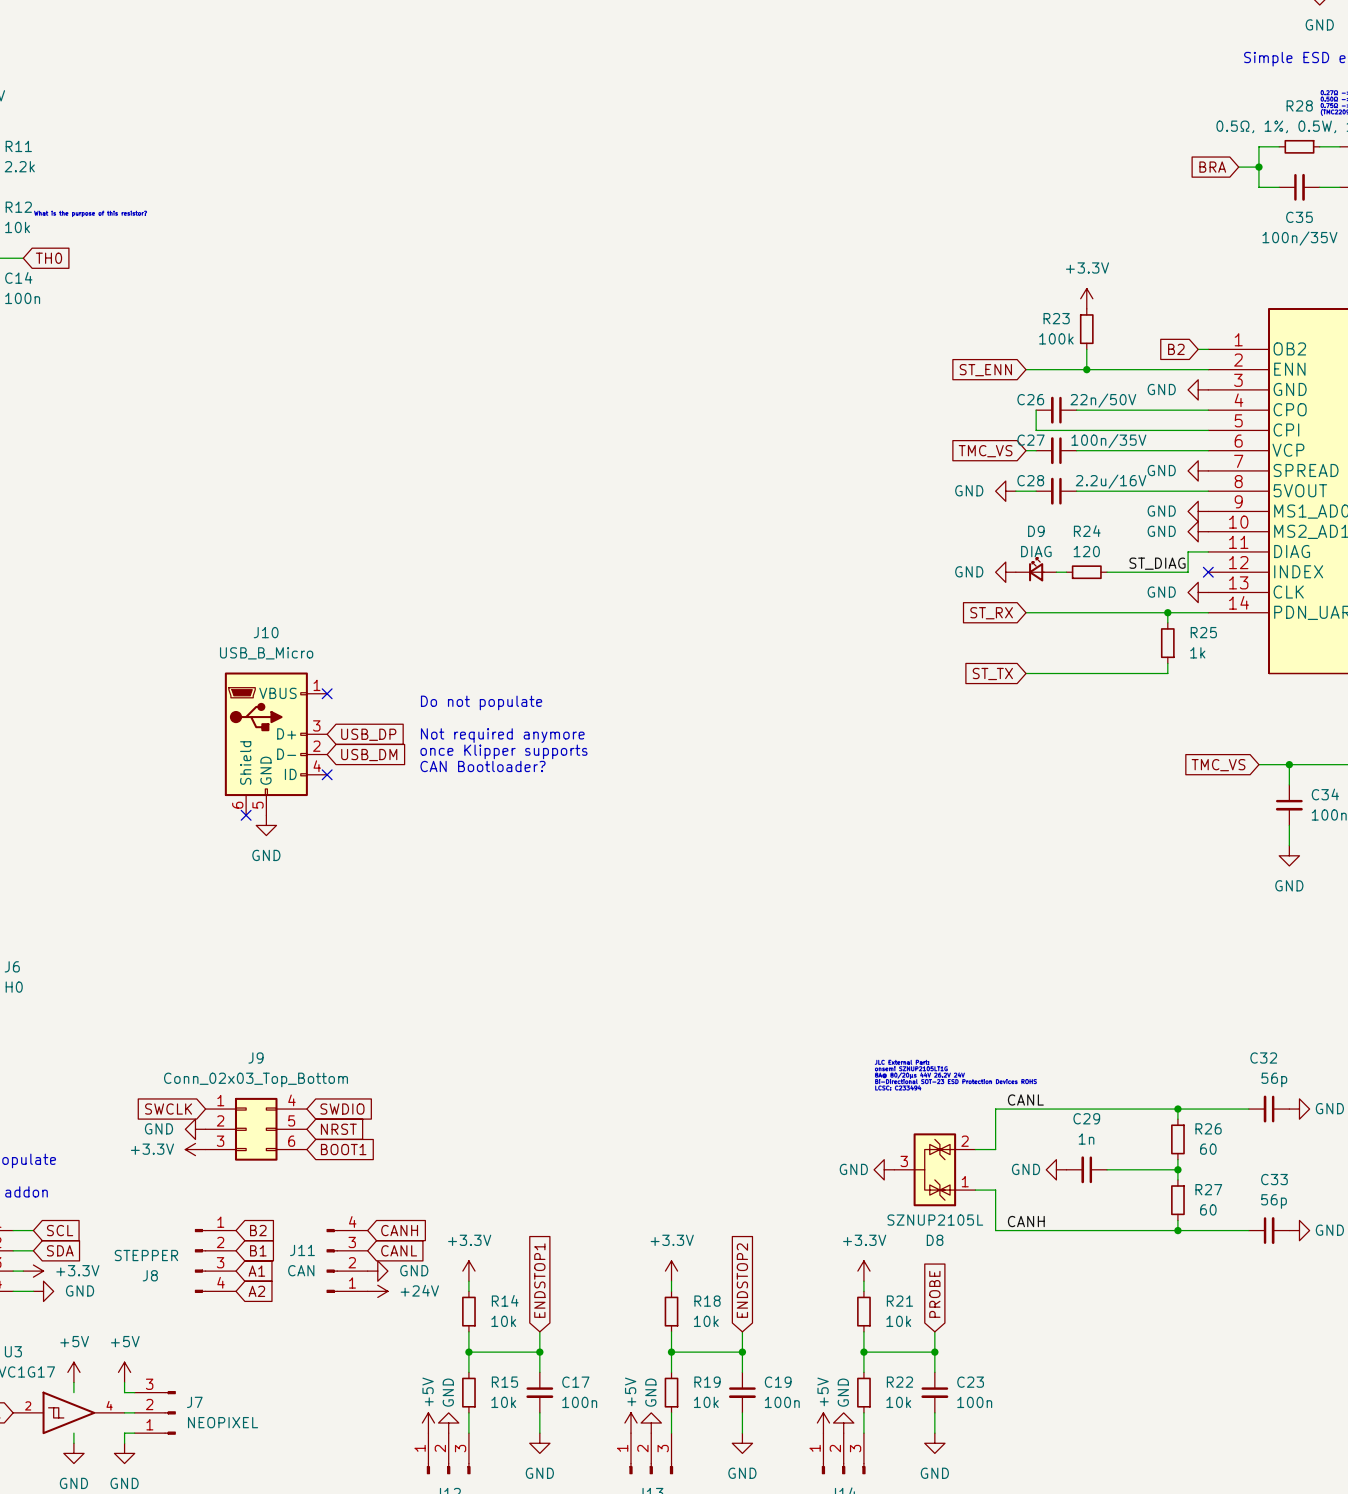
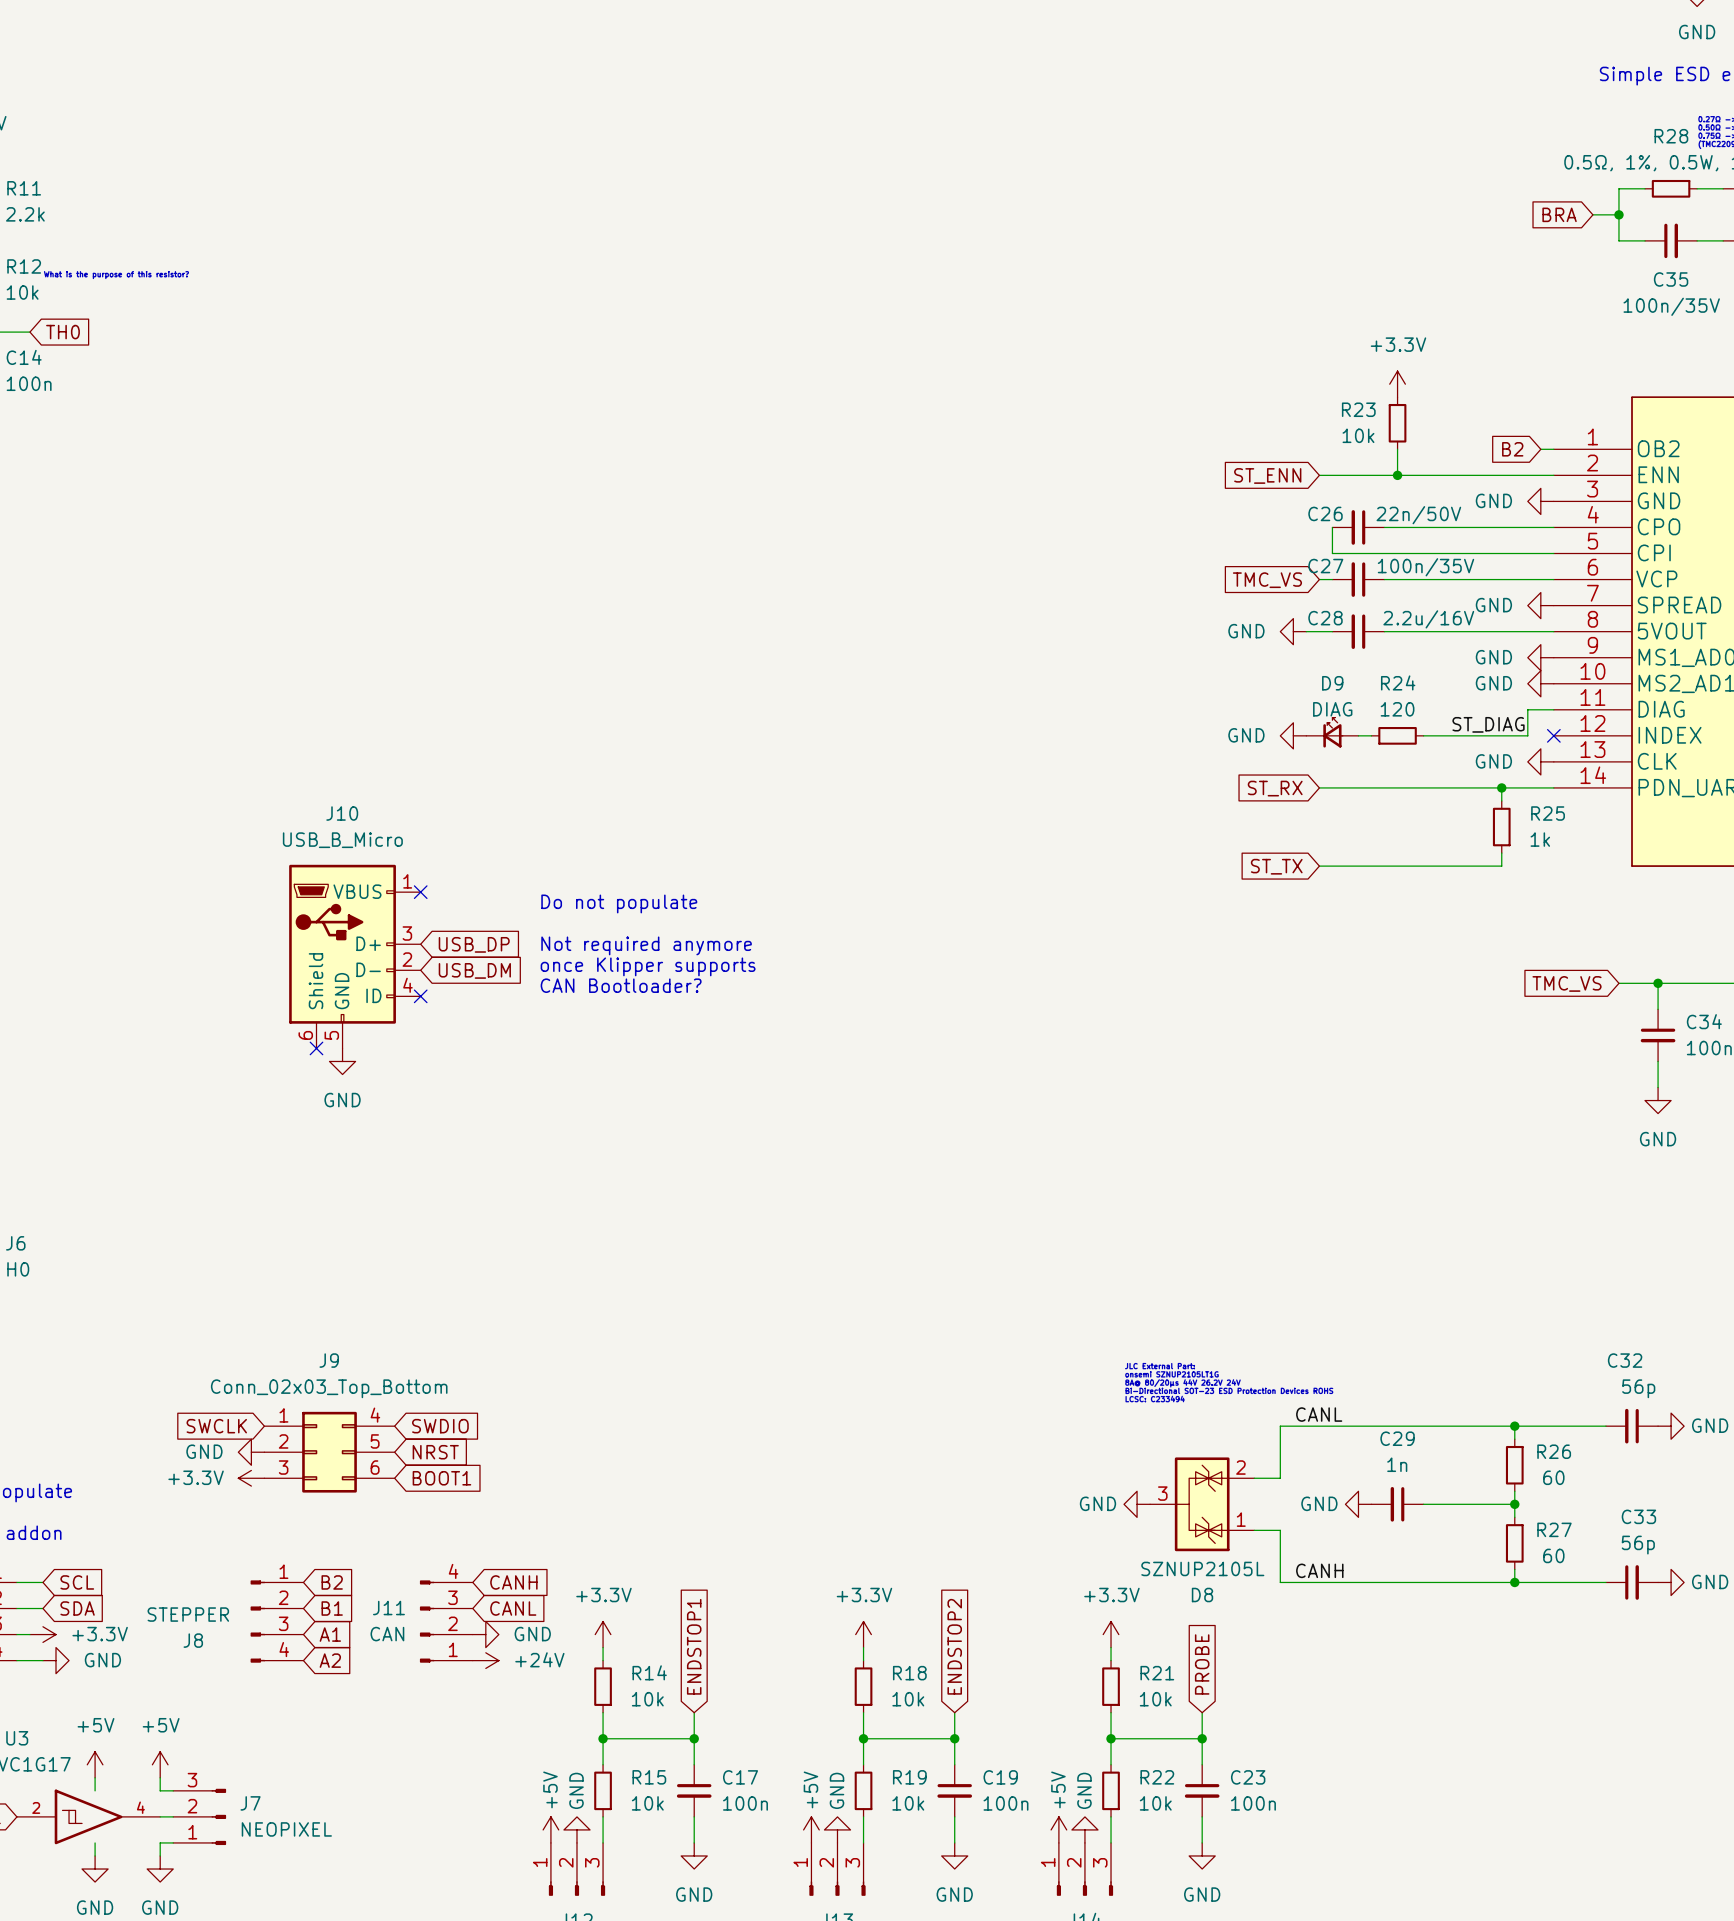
R23 value: 100k (1056, 338) -> 10k (1358, 435)

